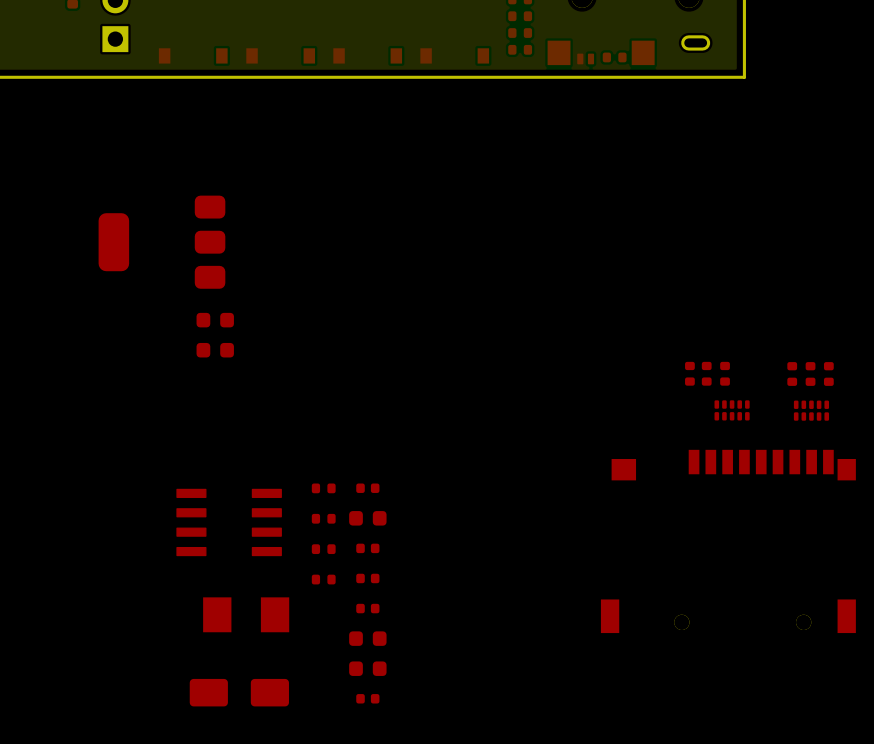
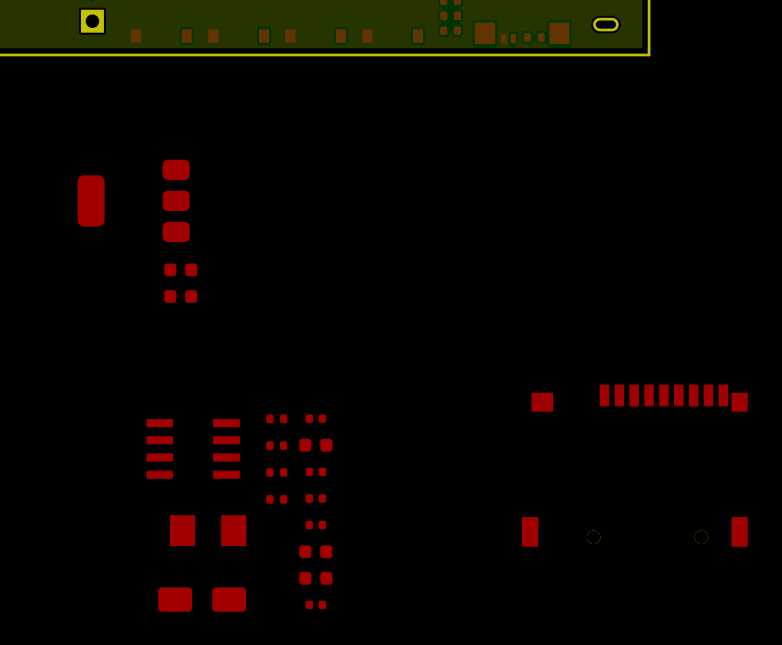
part: (689, 373) -> none
part: (706, 373) -> none
part: (725, 373) -> none
part: (792, 373) -> none
part: (810, 373) -> none
part: (828, 373) -> none
part: (732, 410) -> none
part: (811, 410) -> none

